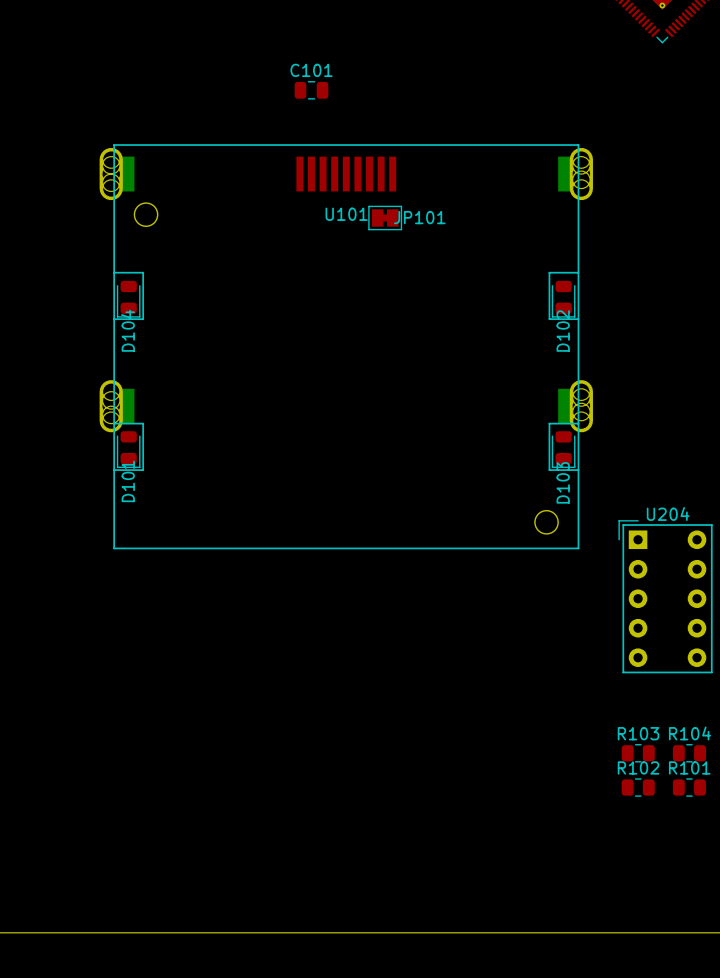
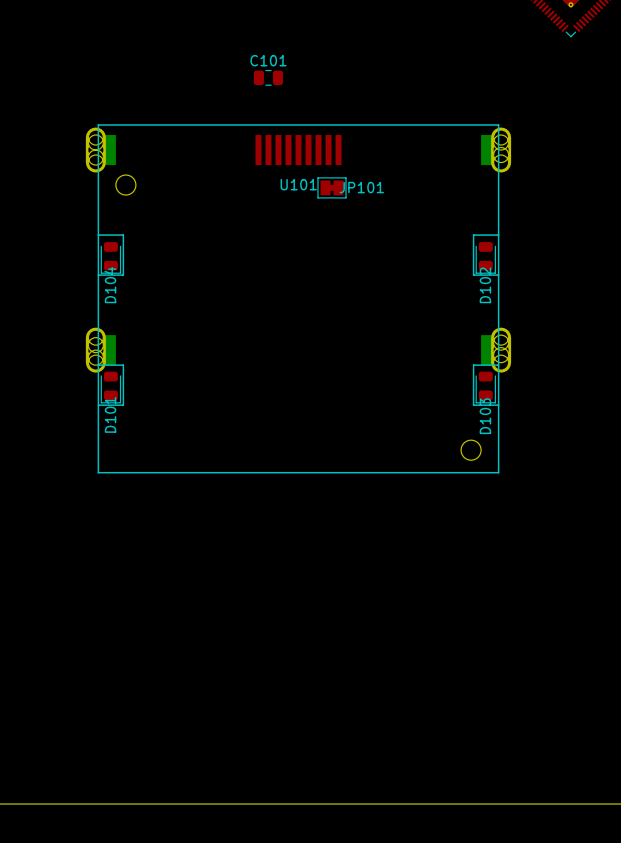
U204: (665, 596) -> none
R103: (638, 753) -> none
R104: (689, 753) -> none
R102: (638, 787) -> none
R101: (689, 787) -> none

